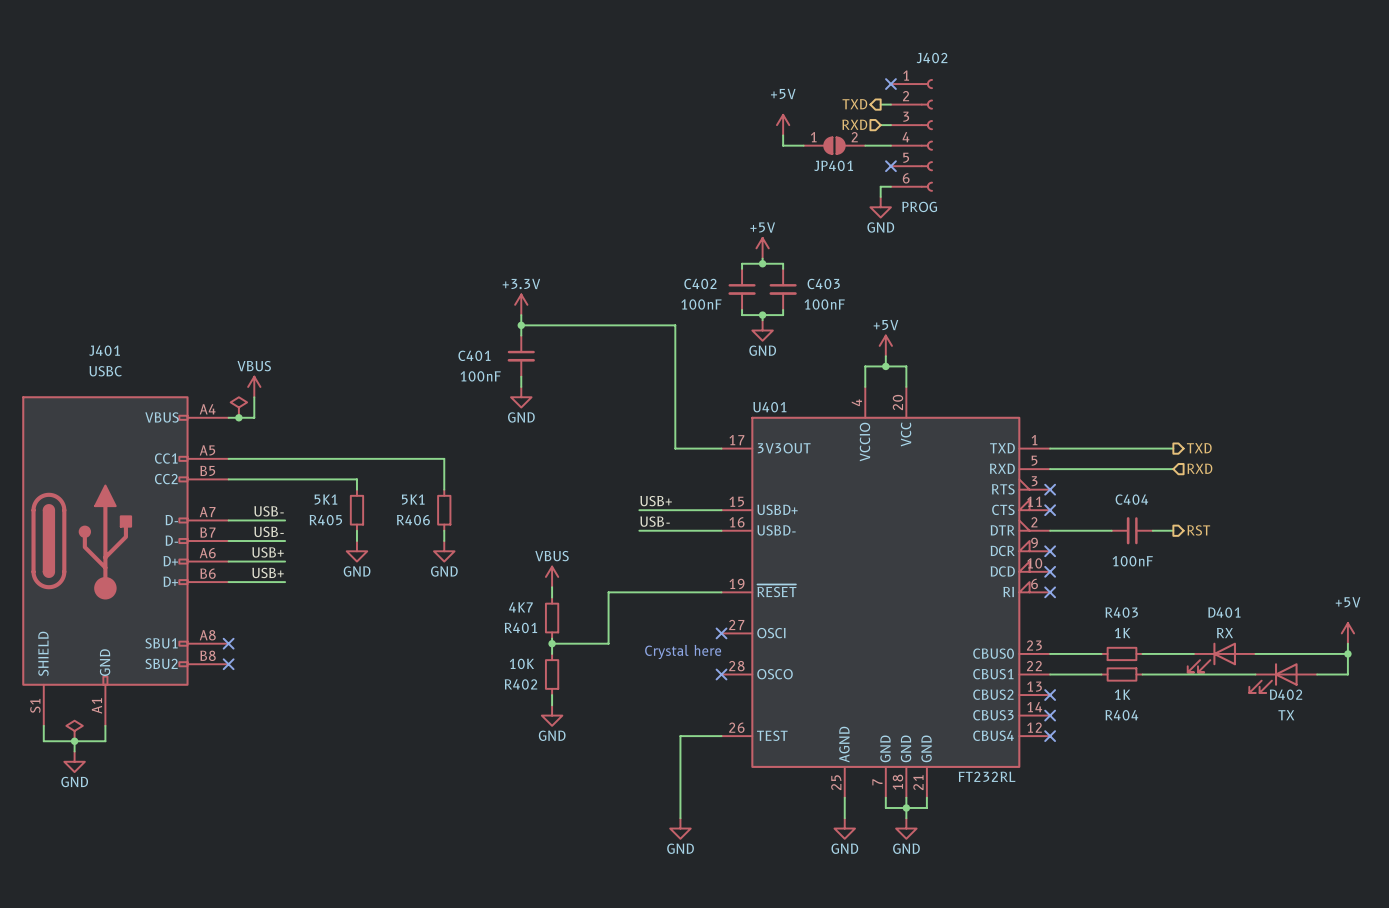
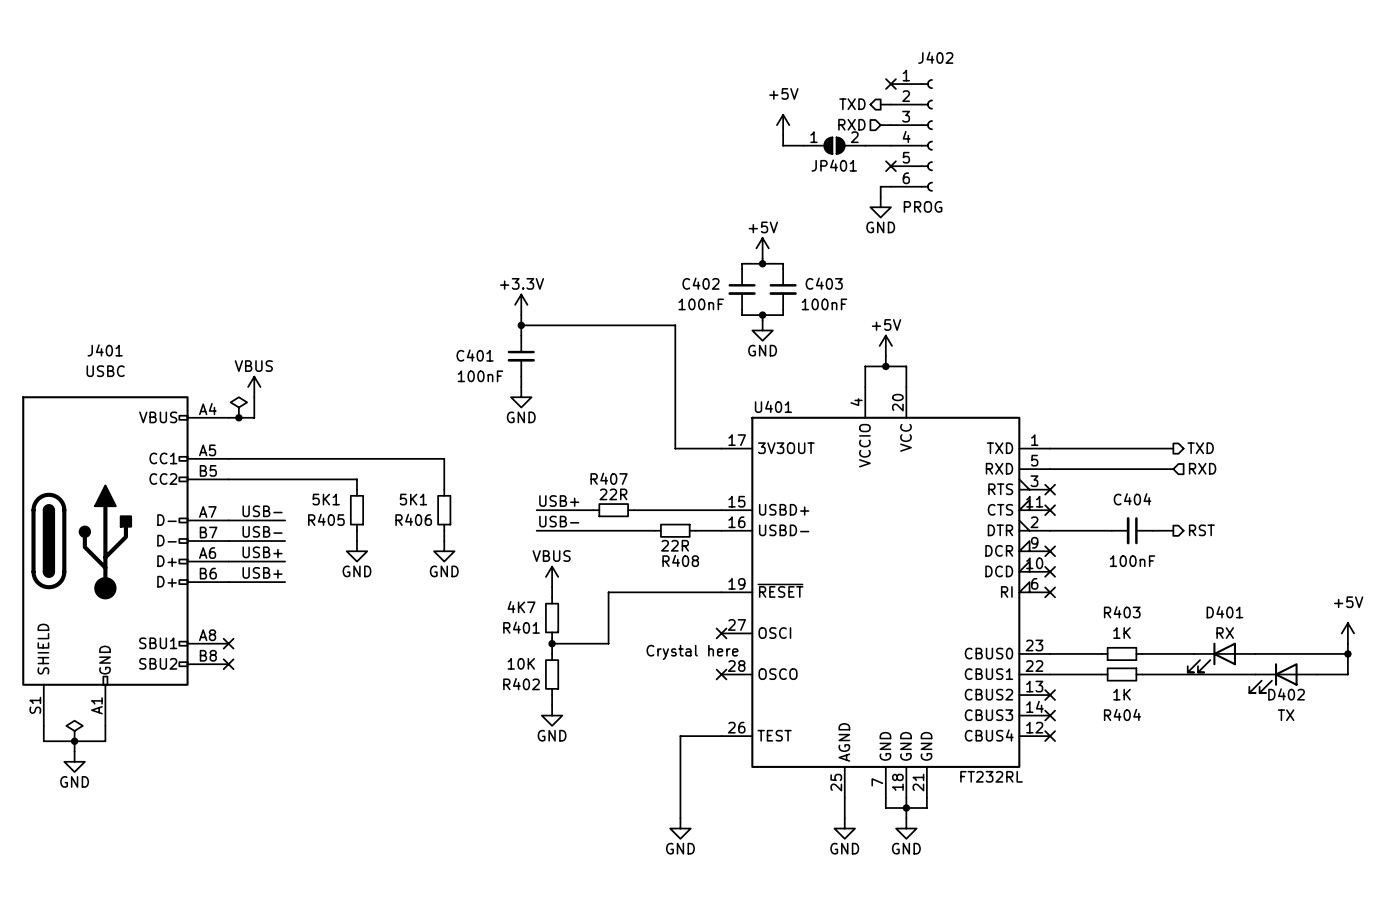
label position: USB+ (656, 501) -> USB+ (559, 501)
wire: none -> (536, 510) (593, 510)
R407: none -> 22R (613, 510)
wire: none -> (634, 510) (639, 510)
label position: USB- (655, 521) -> USB- (559, 521)
wire: none -> (536, 530) (639, 530)
wire: (654, 530) (695, 530) -> none
R408: none -> 22R (675, 530)

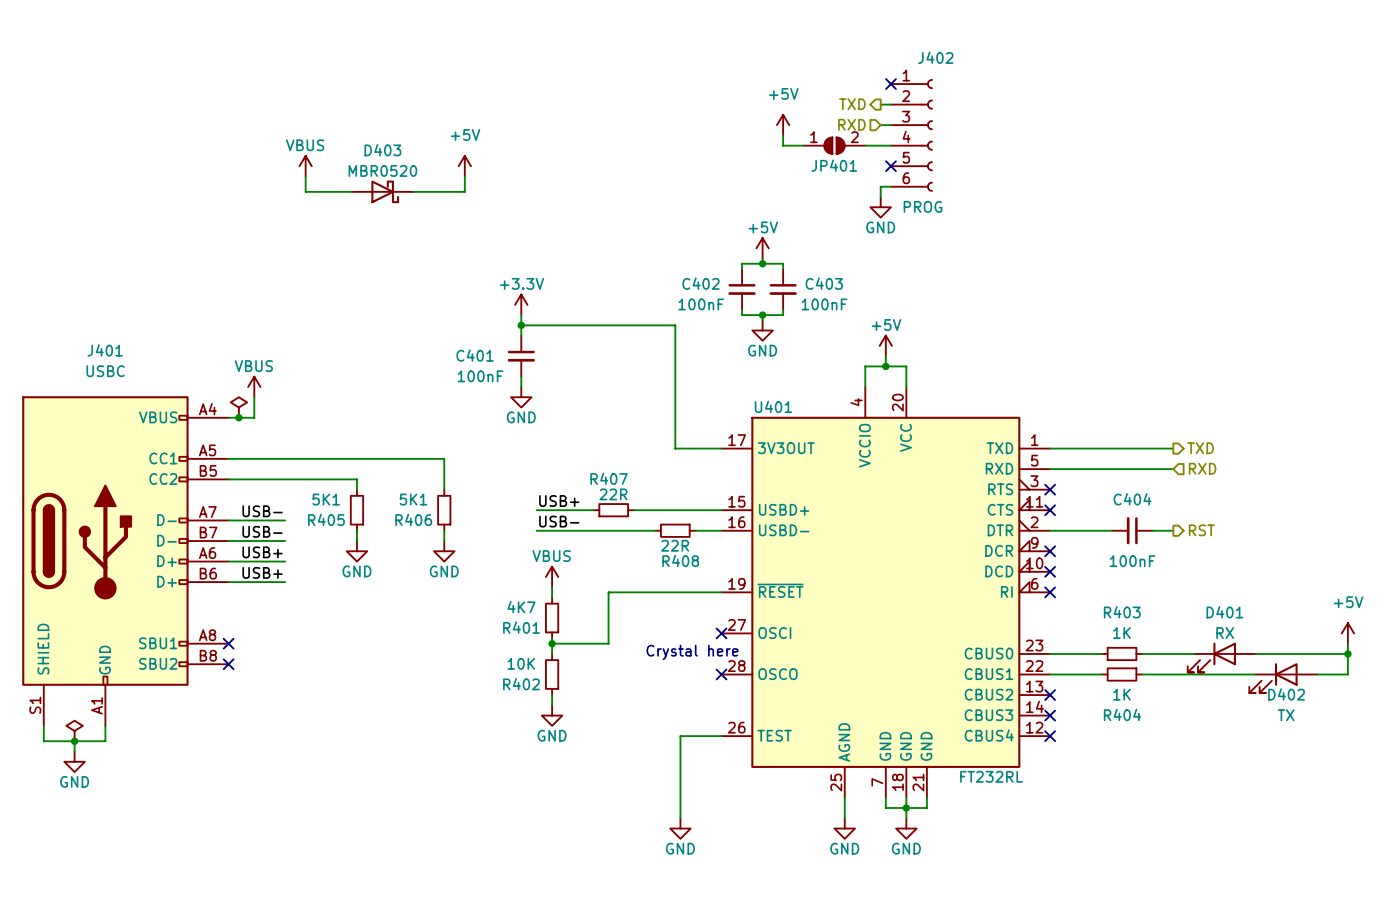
power symbol: none -> VBUS (305, 166)
power symbol: none -> +5V (464, 166)
wire: none -> (305, 176) (305, 191) (351, 191)
wire: none -> (464, 176) (464, 191) (413, 191)
D403: none -> MBR0520 (382, 191)

